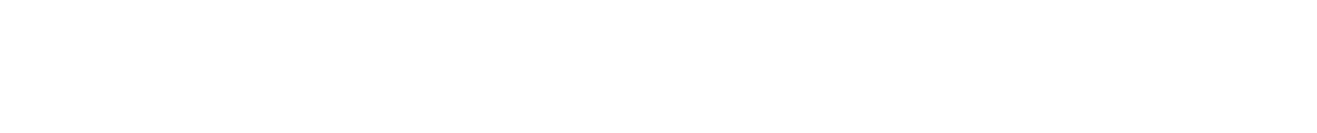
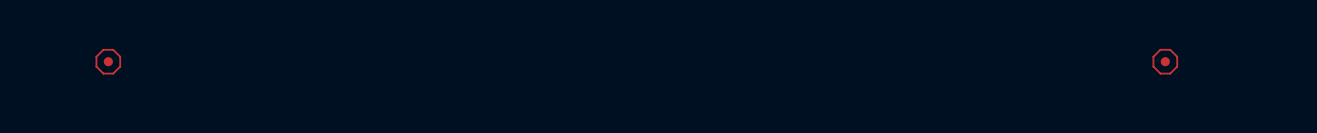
part: none -> (108, 61)
part: none -> (1165, 61)

